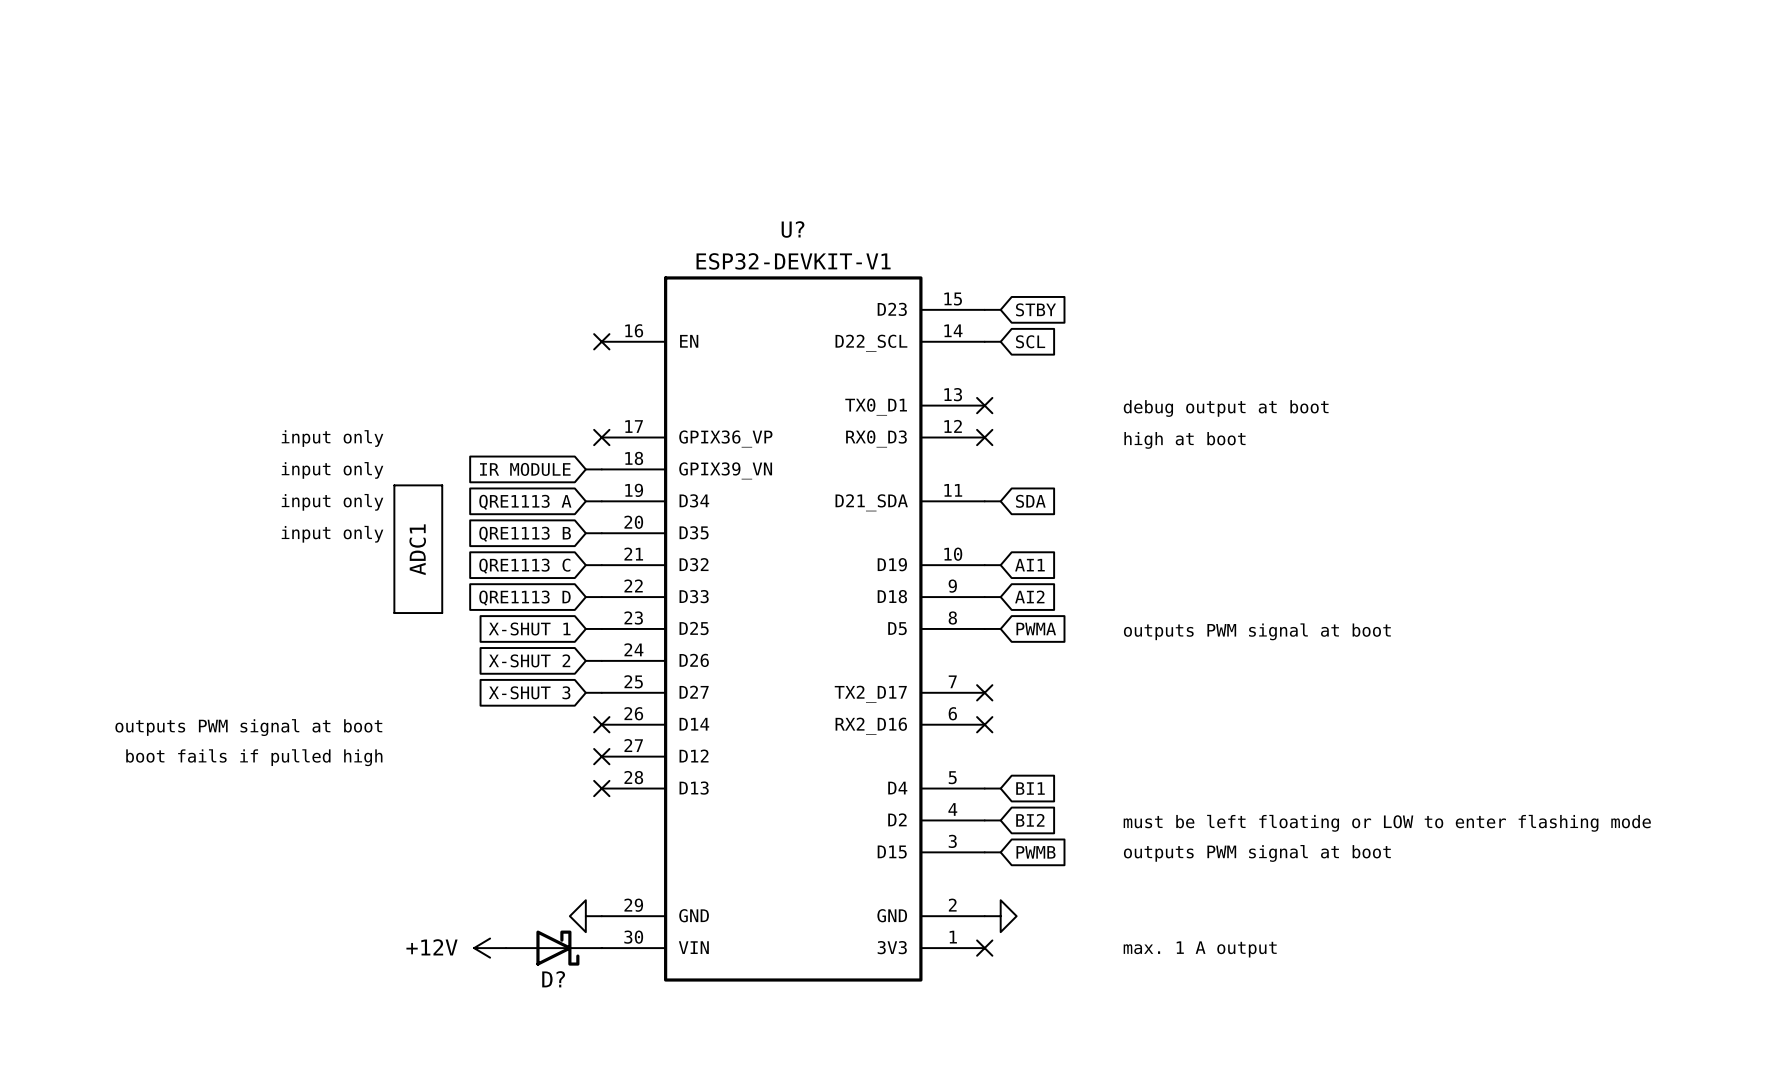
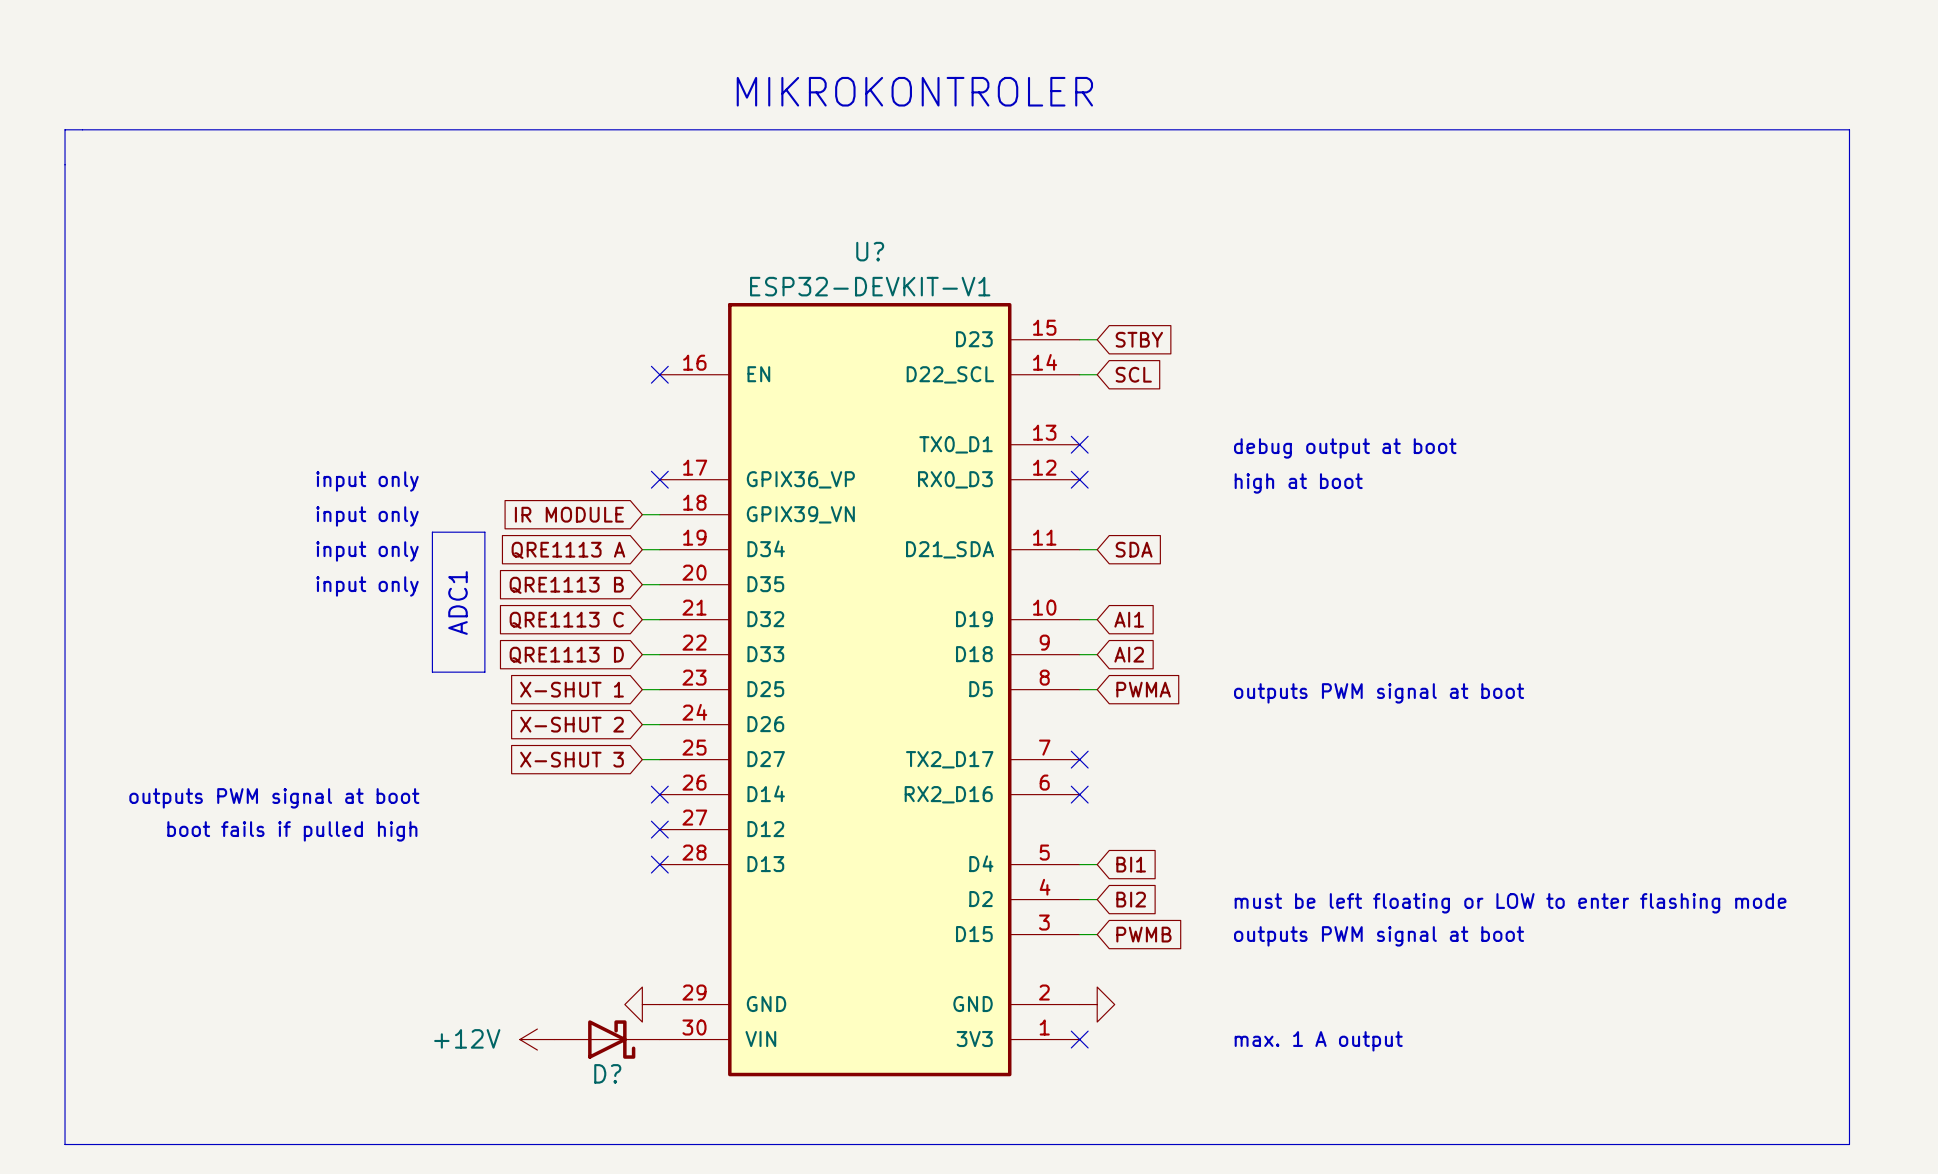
text: none -> MIKROKONTROLER (914, 91)
line: none -> (65, 129) (65, 1144) (1849, 1144) (1849, 129) (65, 129)

